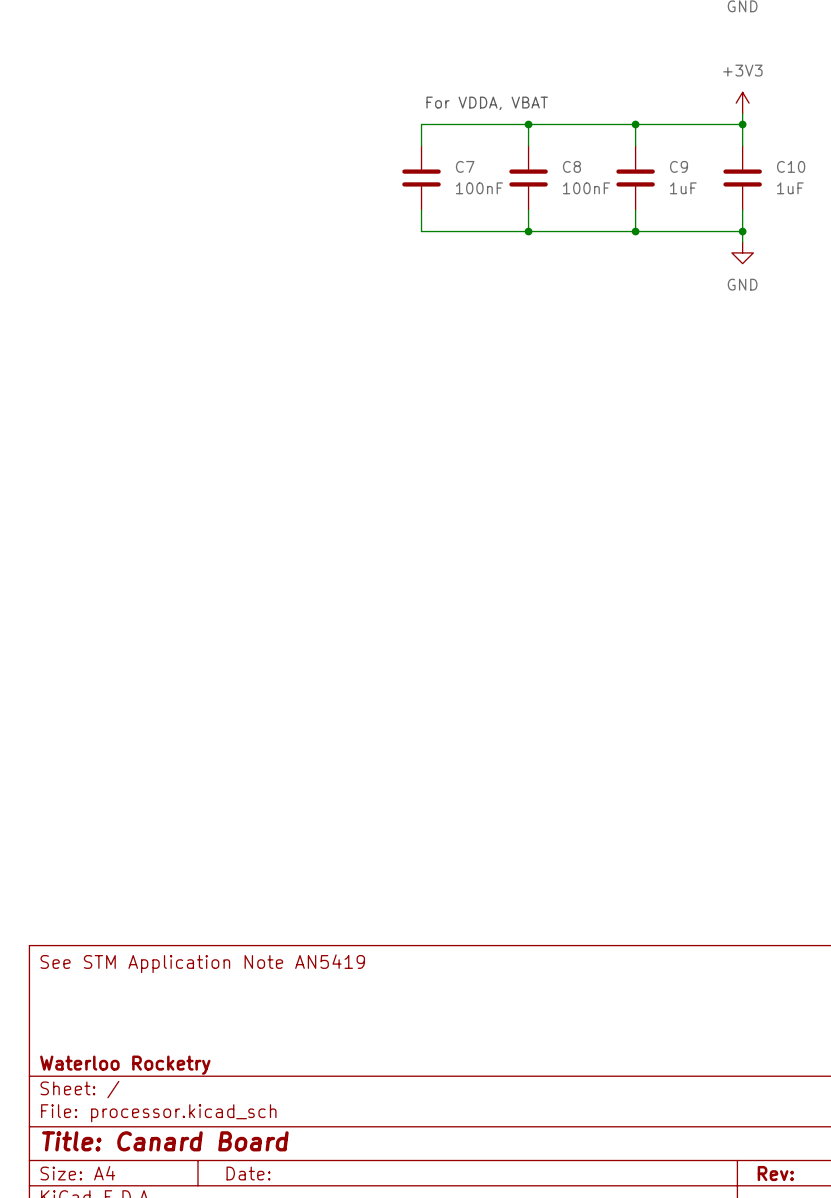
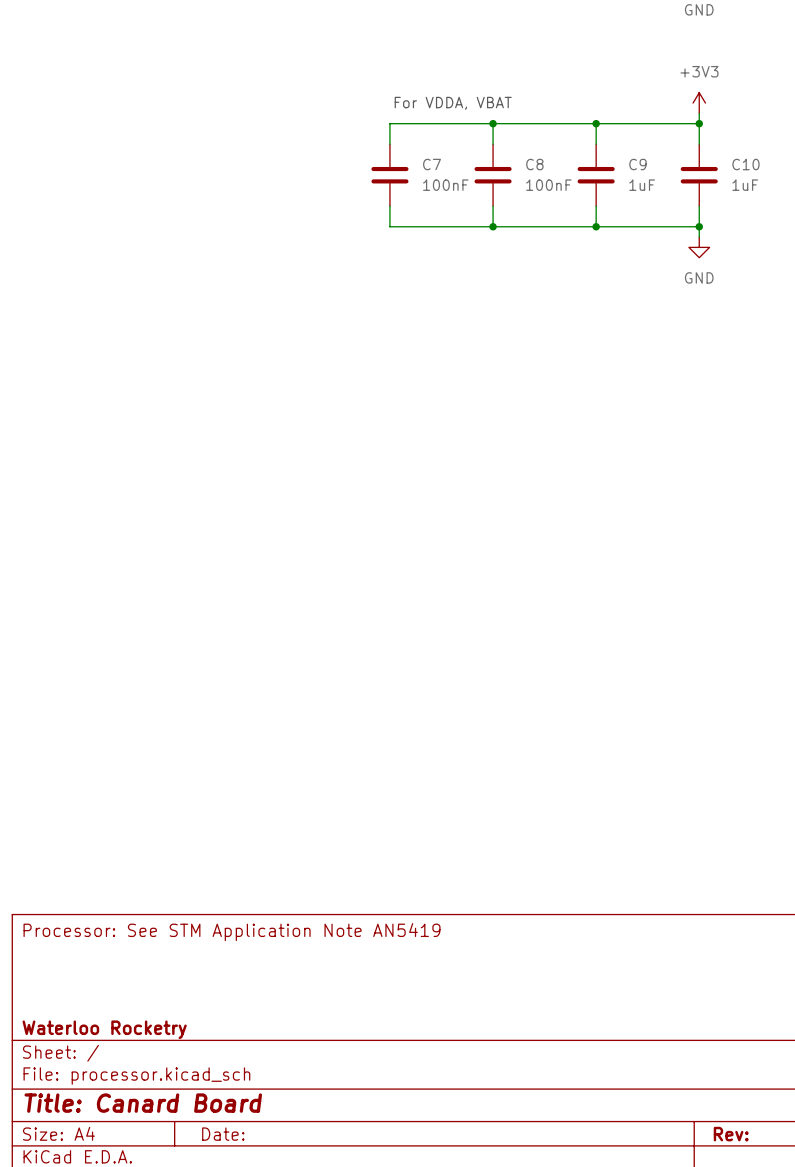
title block: See STM Application Note AN5419 (202, 963) -> Processor: See STM Application Note AN5419 (232, 932)

